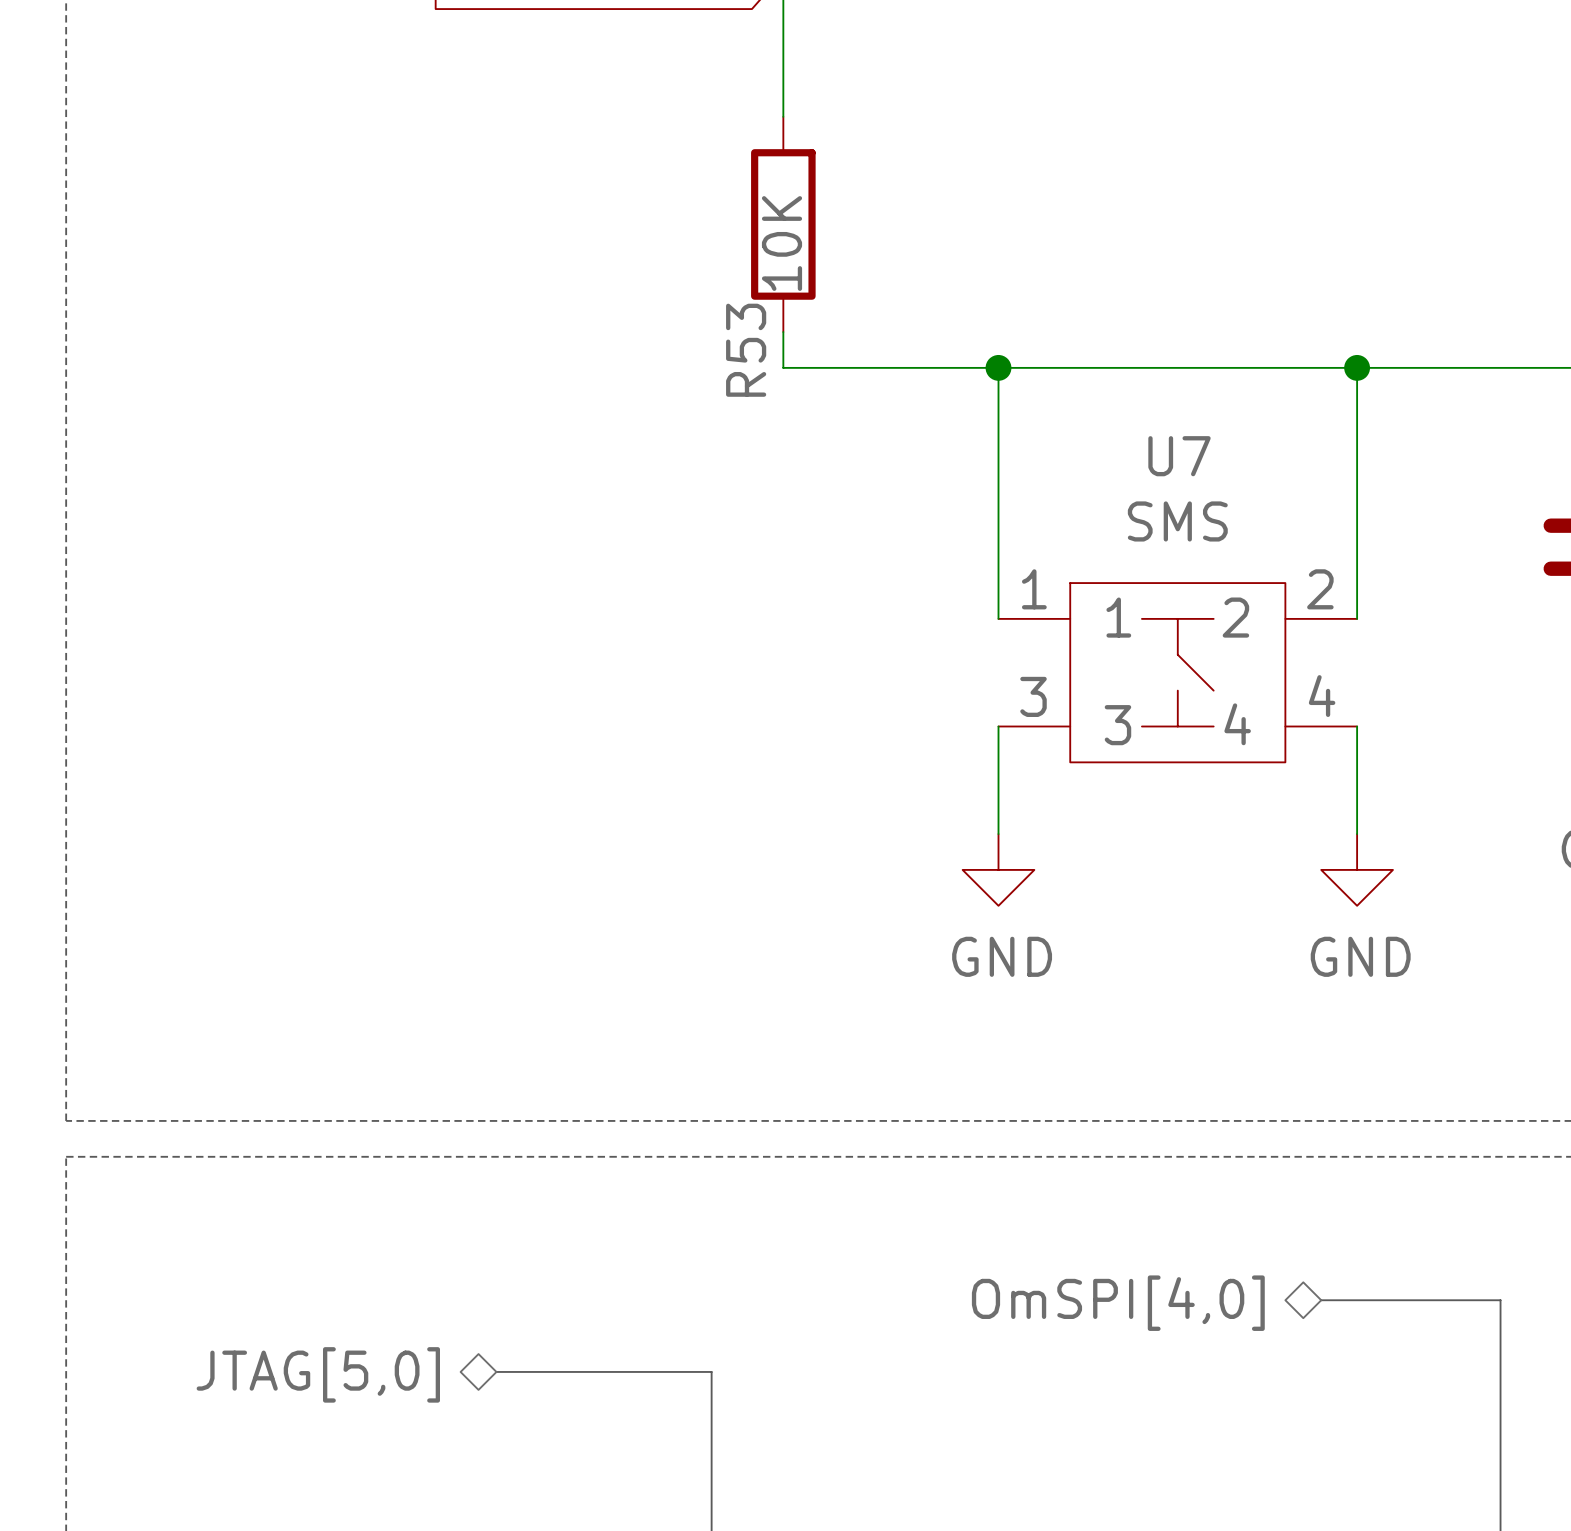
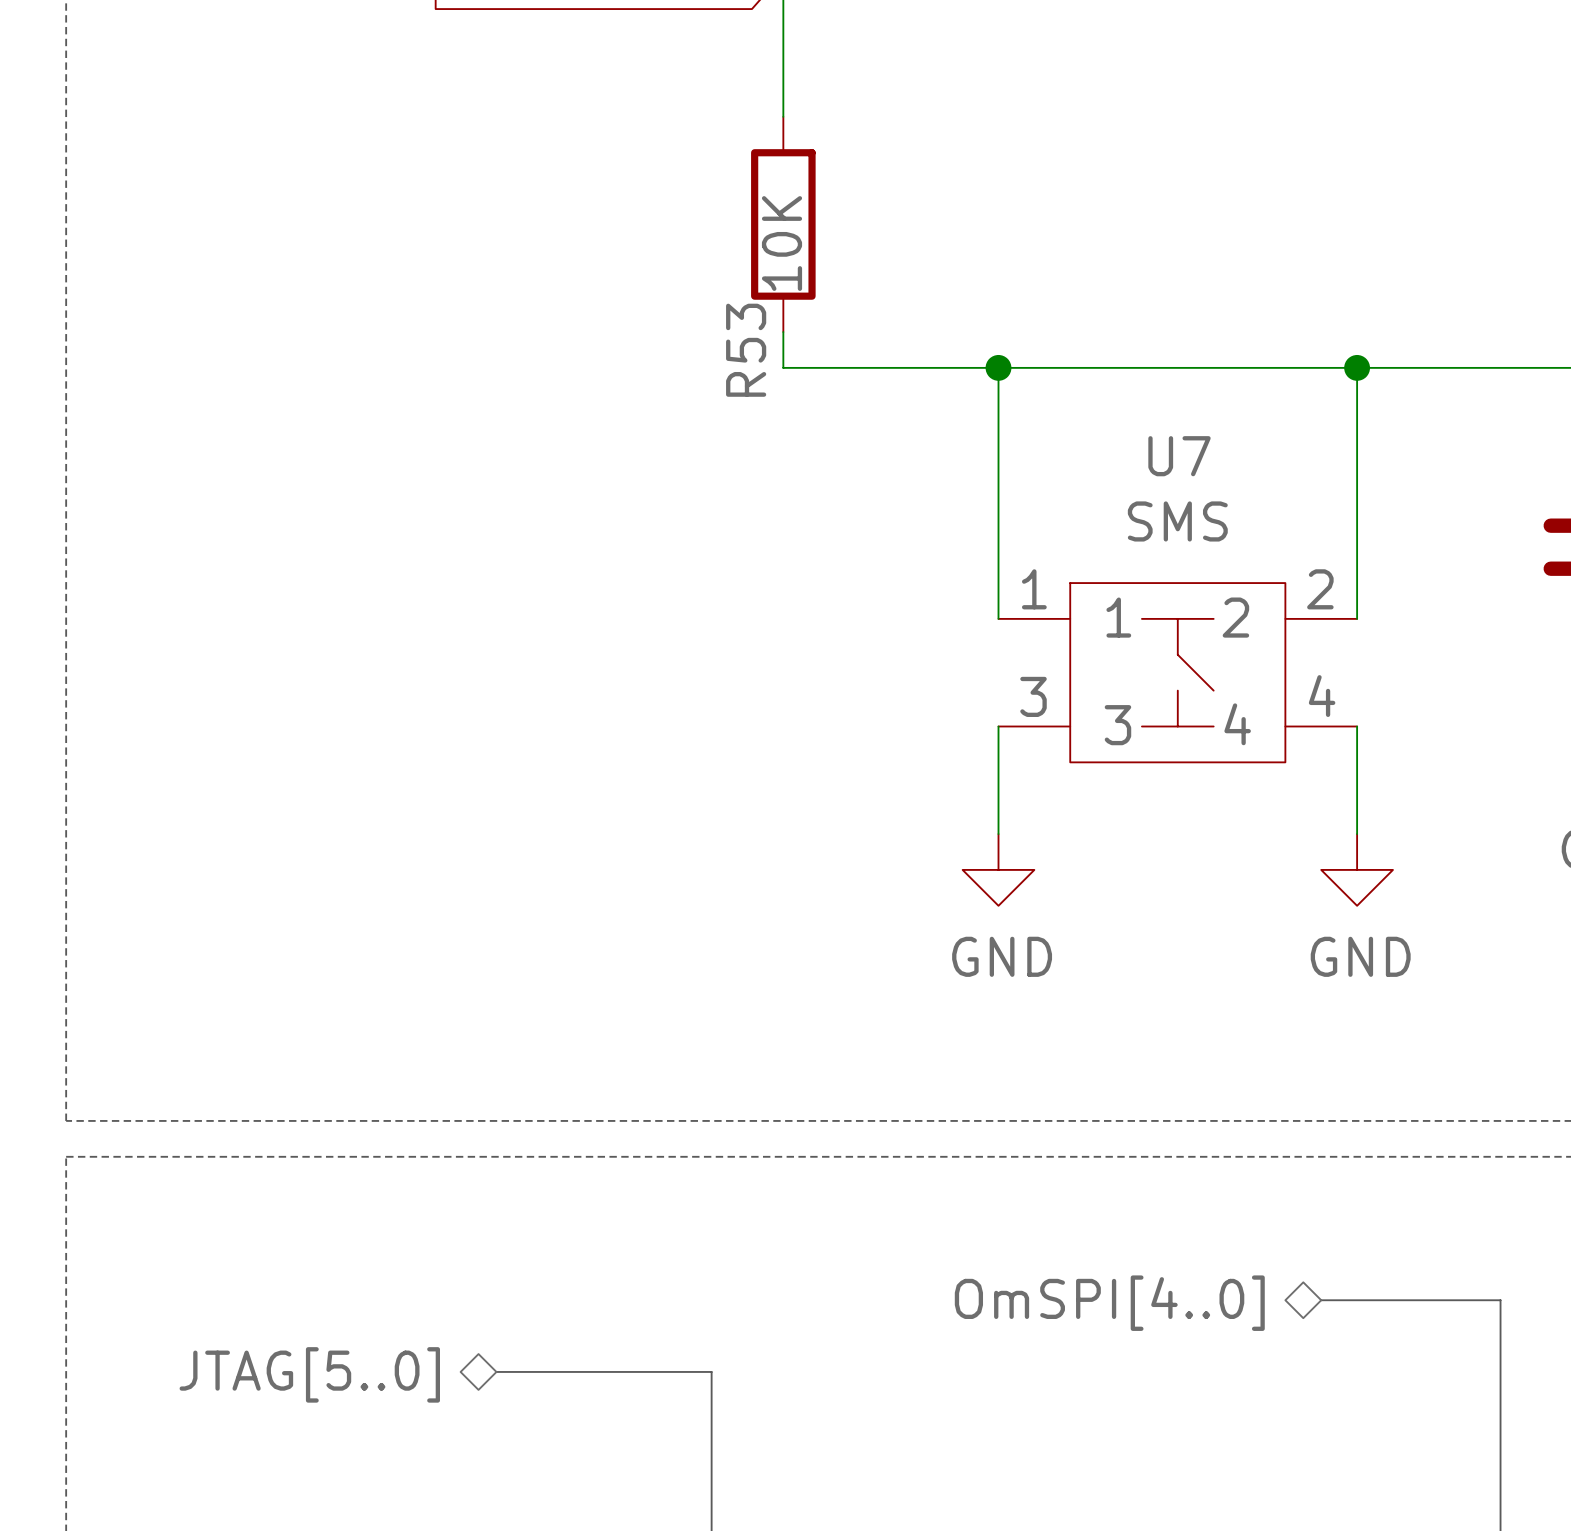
hierarchical label: OmSPI[4,0] (1118, 1303) -> OmSPI[4..0] (1109, 1303)
hierarchical label: JTAG[5,0] (318, 1374) -> JTAG[5..0] (309, 1374)

